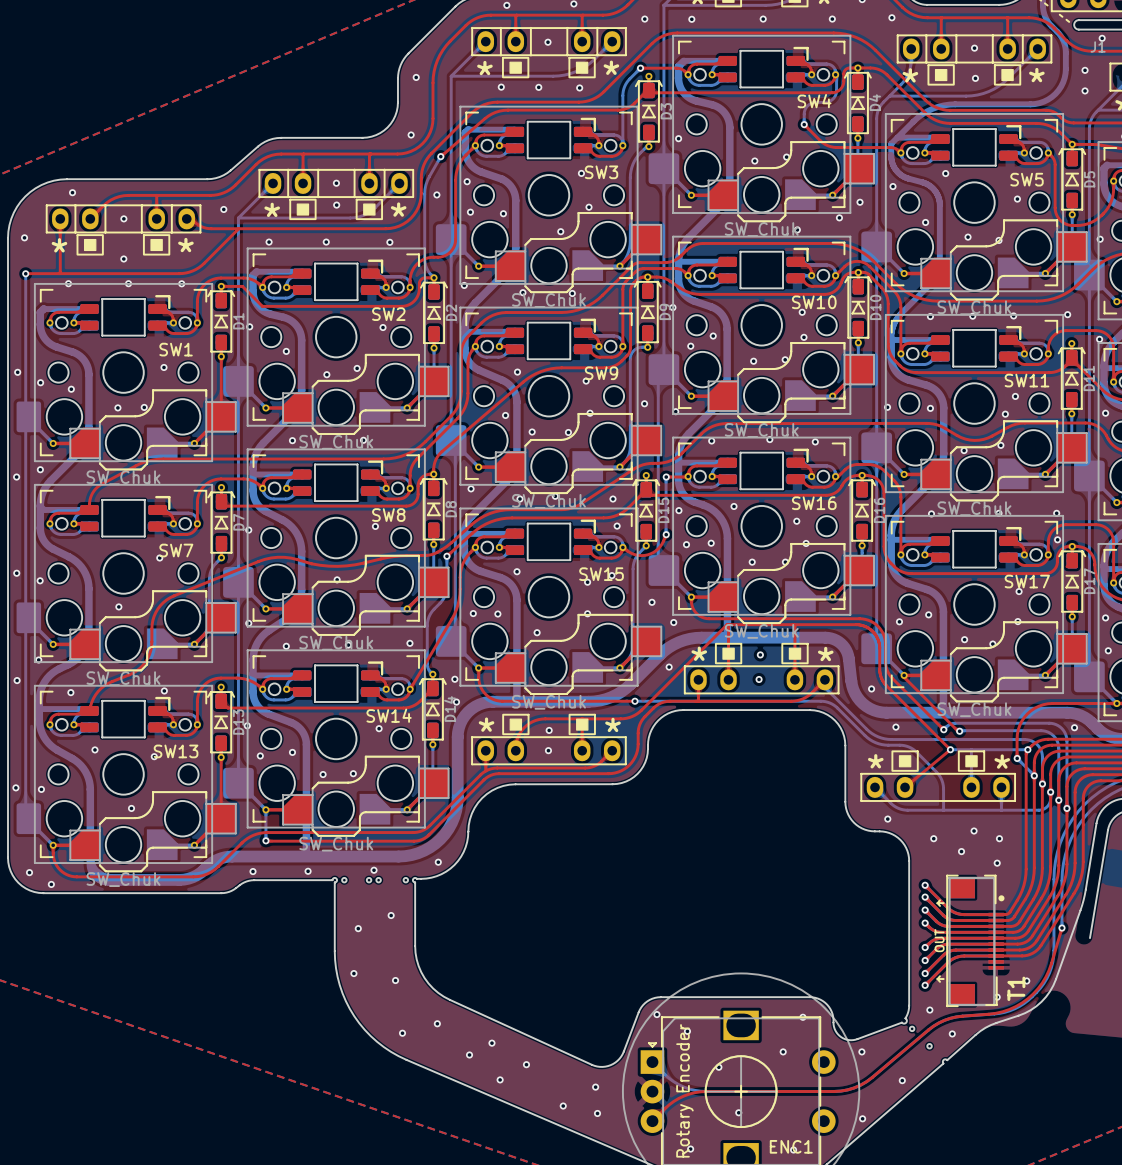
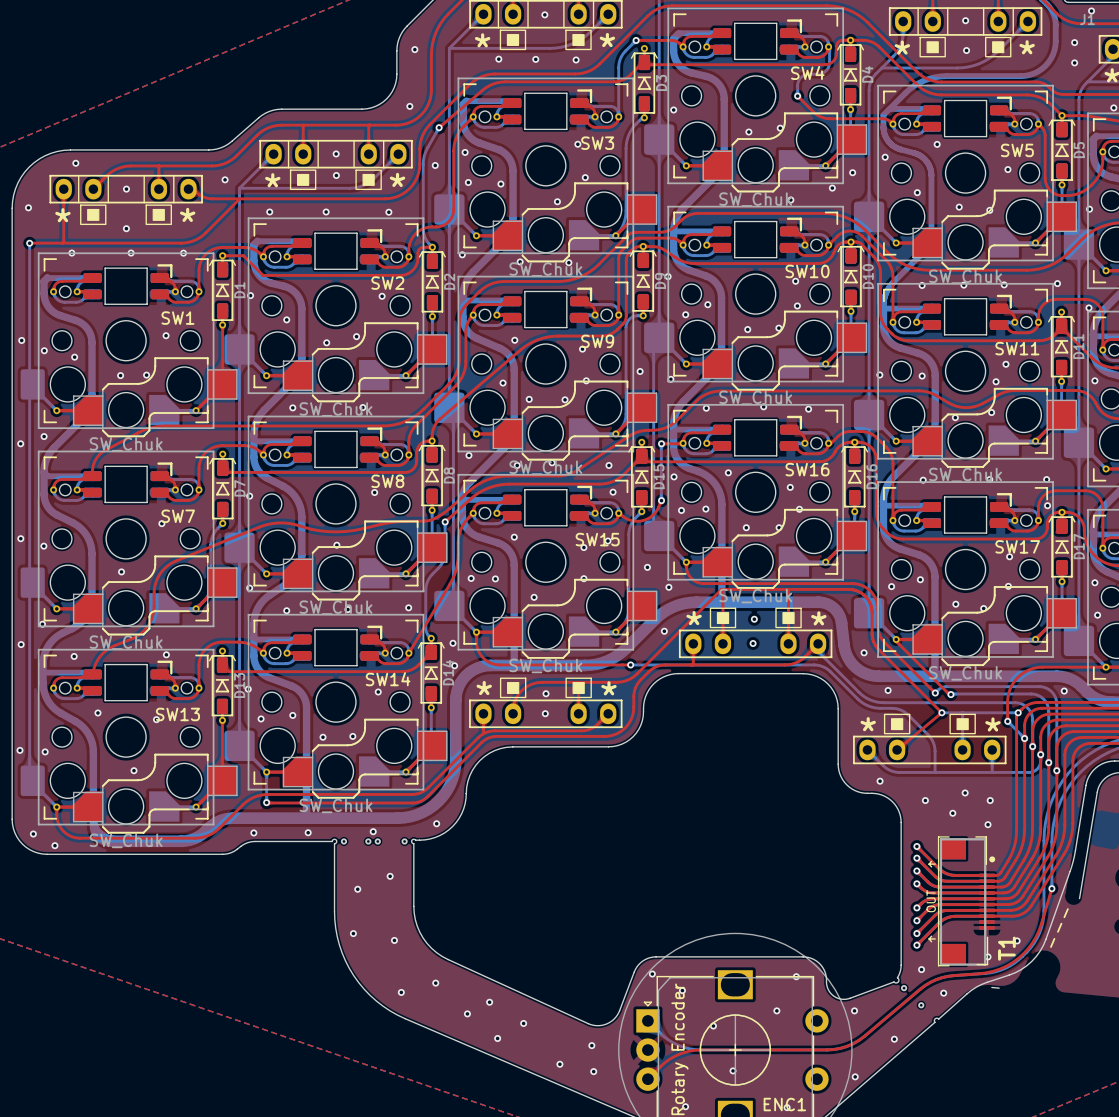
line: none -> (1067, 909) (1064, 917)
line: none -> (1061, 923) (1057, 931)
line: none -> (1054, 938) (1050, 946)
board edge: none -> (991, 987) (999, 988)

